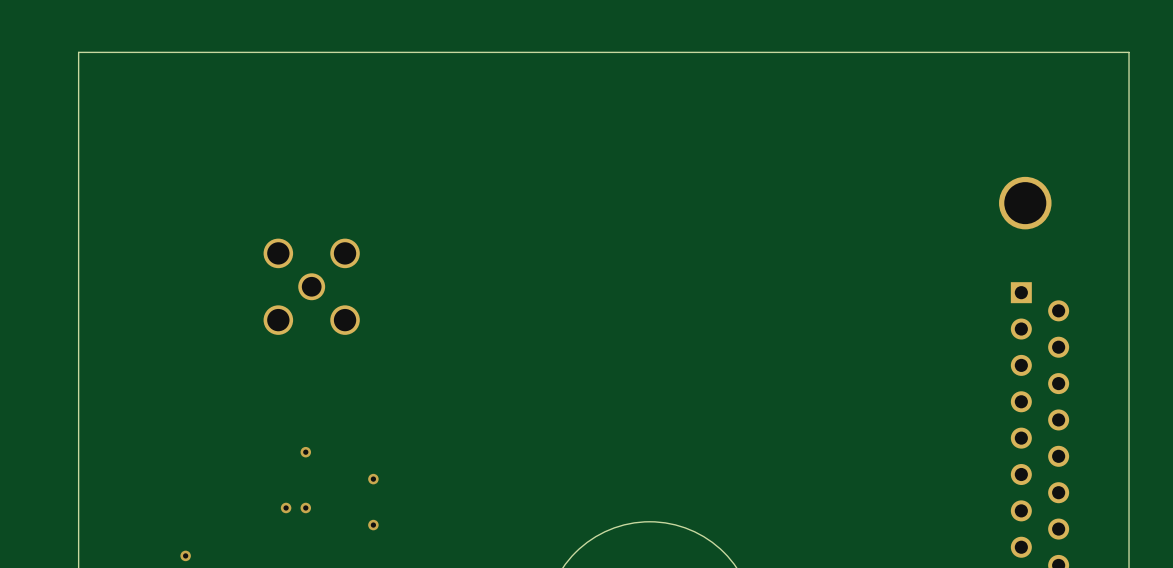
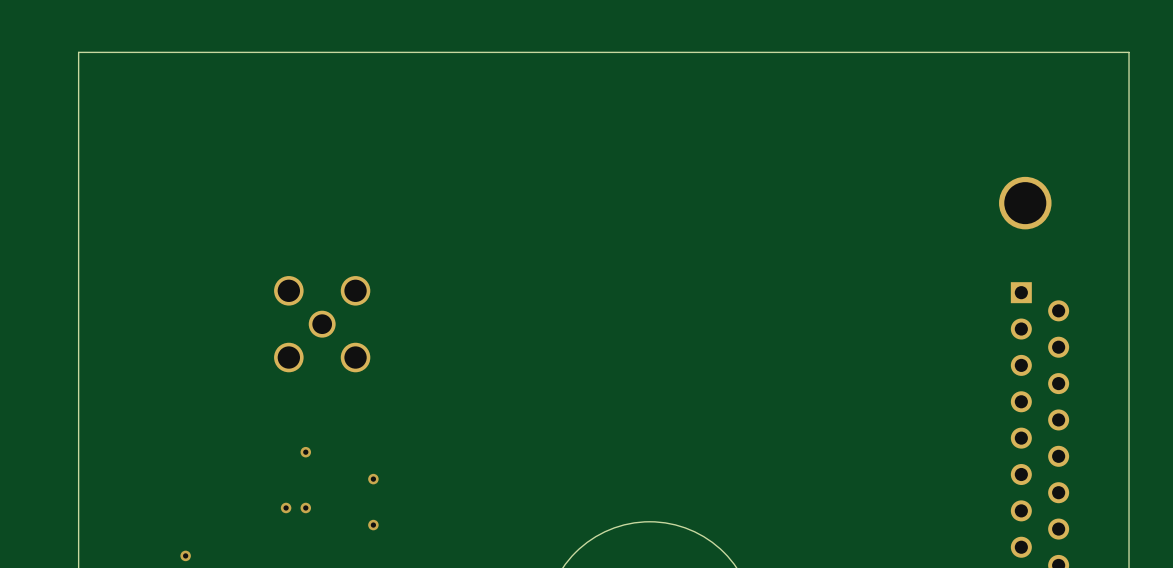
part position: (311, 286) -> (322, 324)

